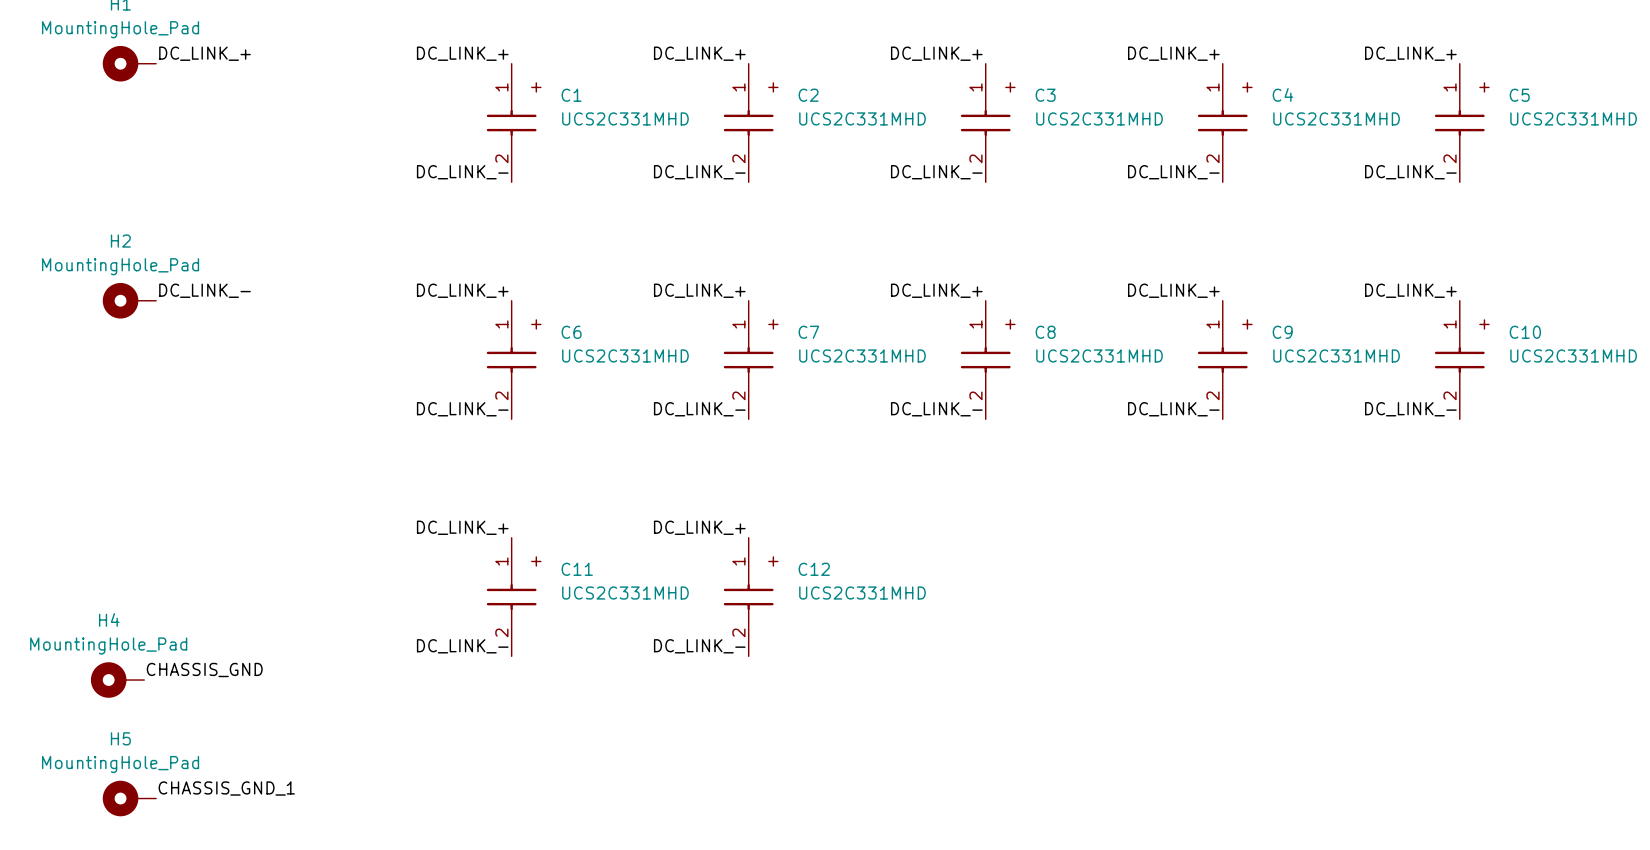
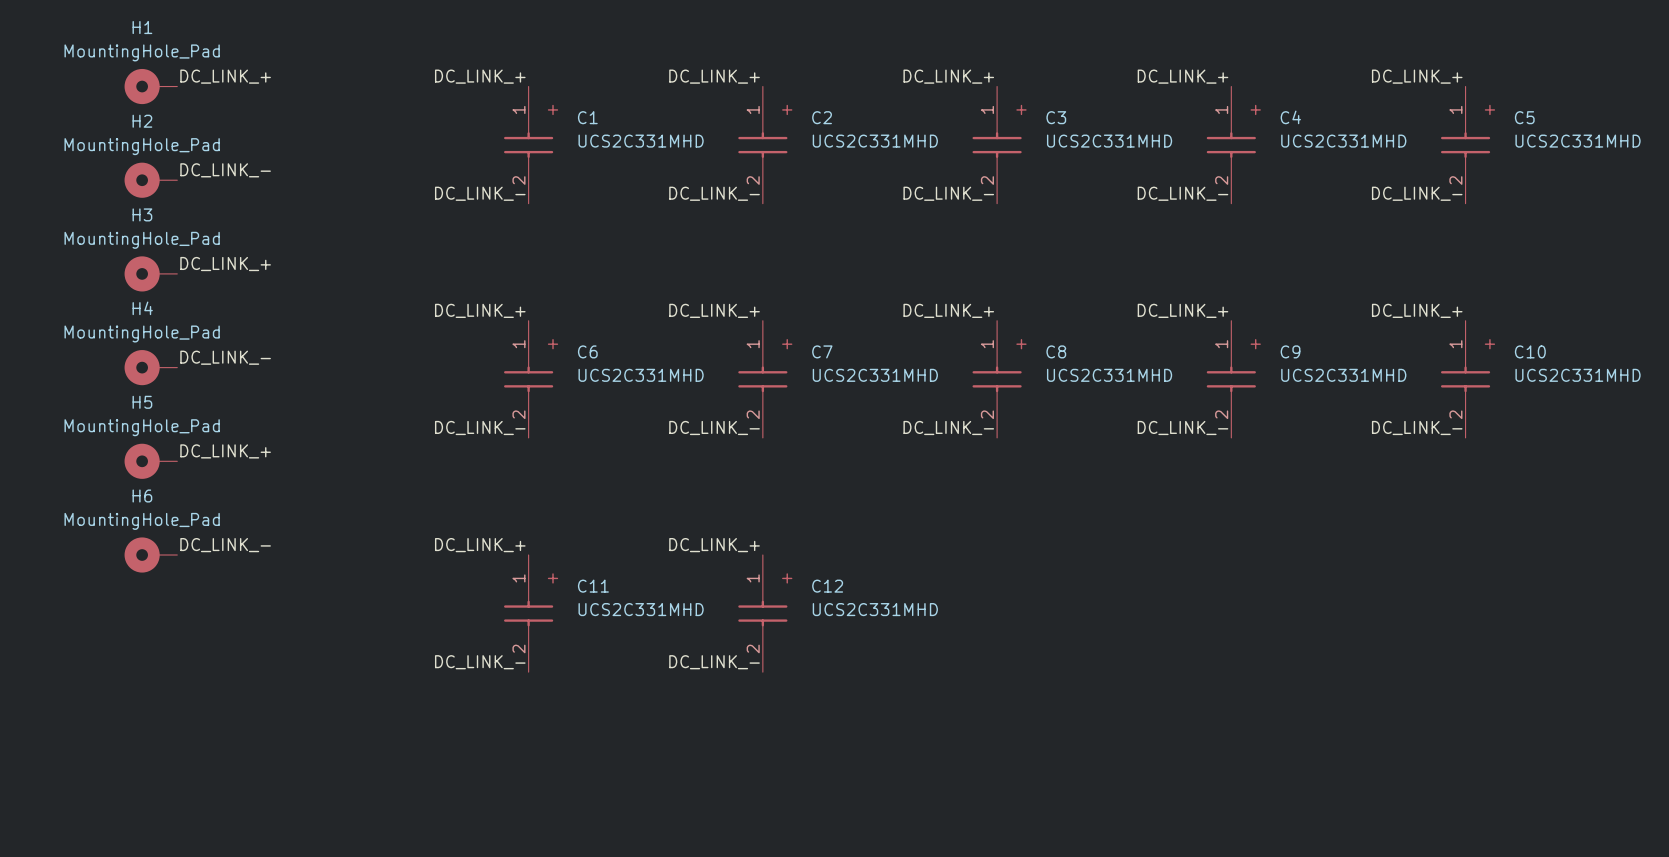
label: none -> DC_LINK_- (225, 170)
label: none -> DC_LINK_+ (225, 264)
H3: none -> MountingHole_Pad (150, 273)
label position: DC_LINK_- (205, 290) -> DC_LINK_- (225, 357)
H2 position: (129, 300) -> (150, 180)
label: none -> DC_LINK_+ (225, 451)
label: none -> DC_LINK_- (225, 545)
H6: none -> MountingHole_Pad (150, 555)
label: CHASSIS_GND (204, 670) -> none
H4 position: (117, 680) -> (150, 367)
label: CHASSIS_GND_1 (226, 788) -> none
H5 position: (129, 798) -> (150, 461)

